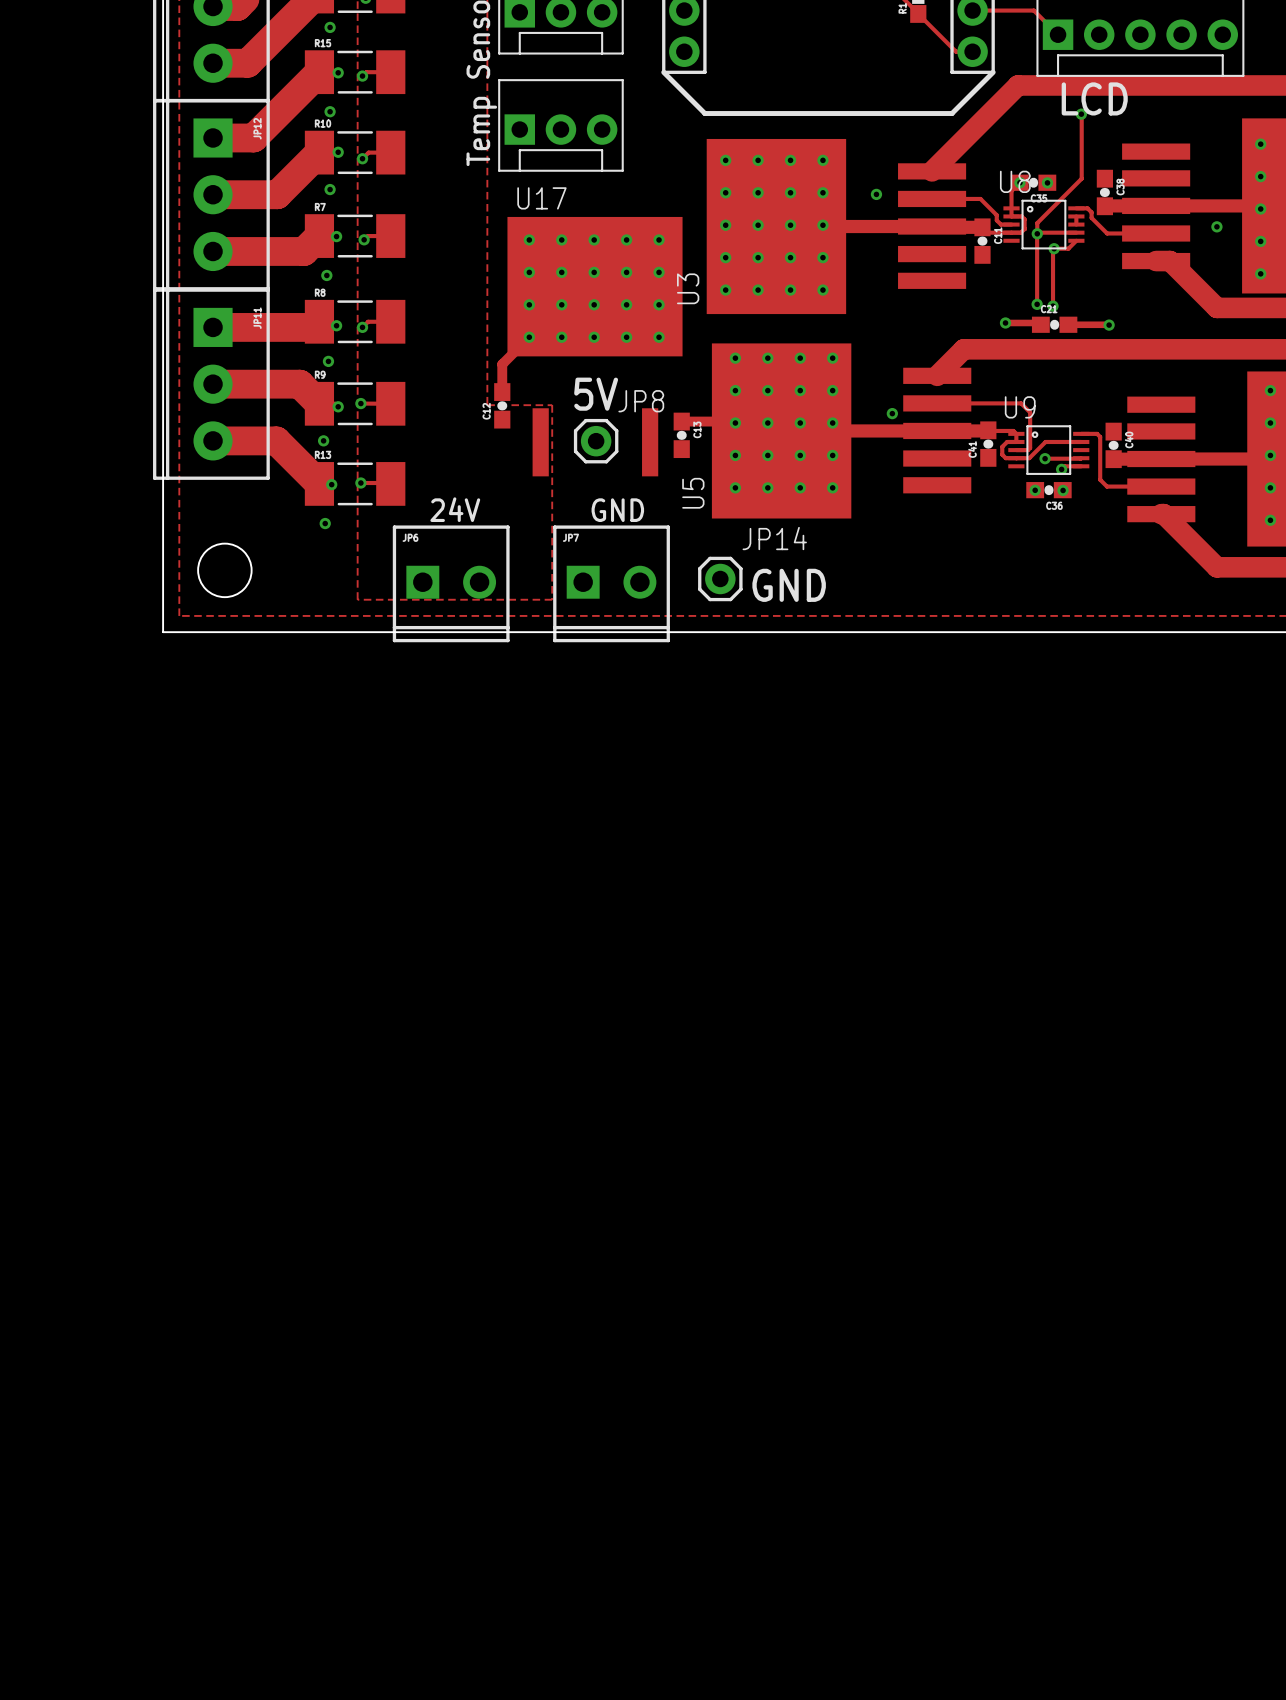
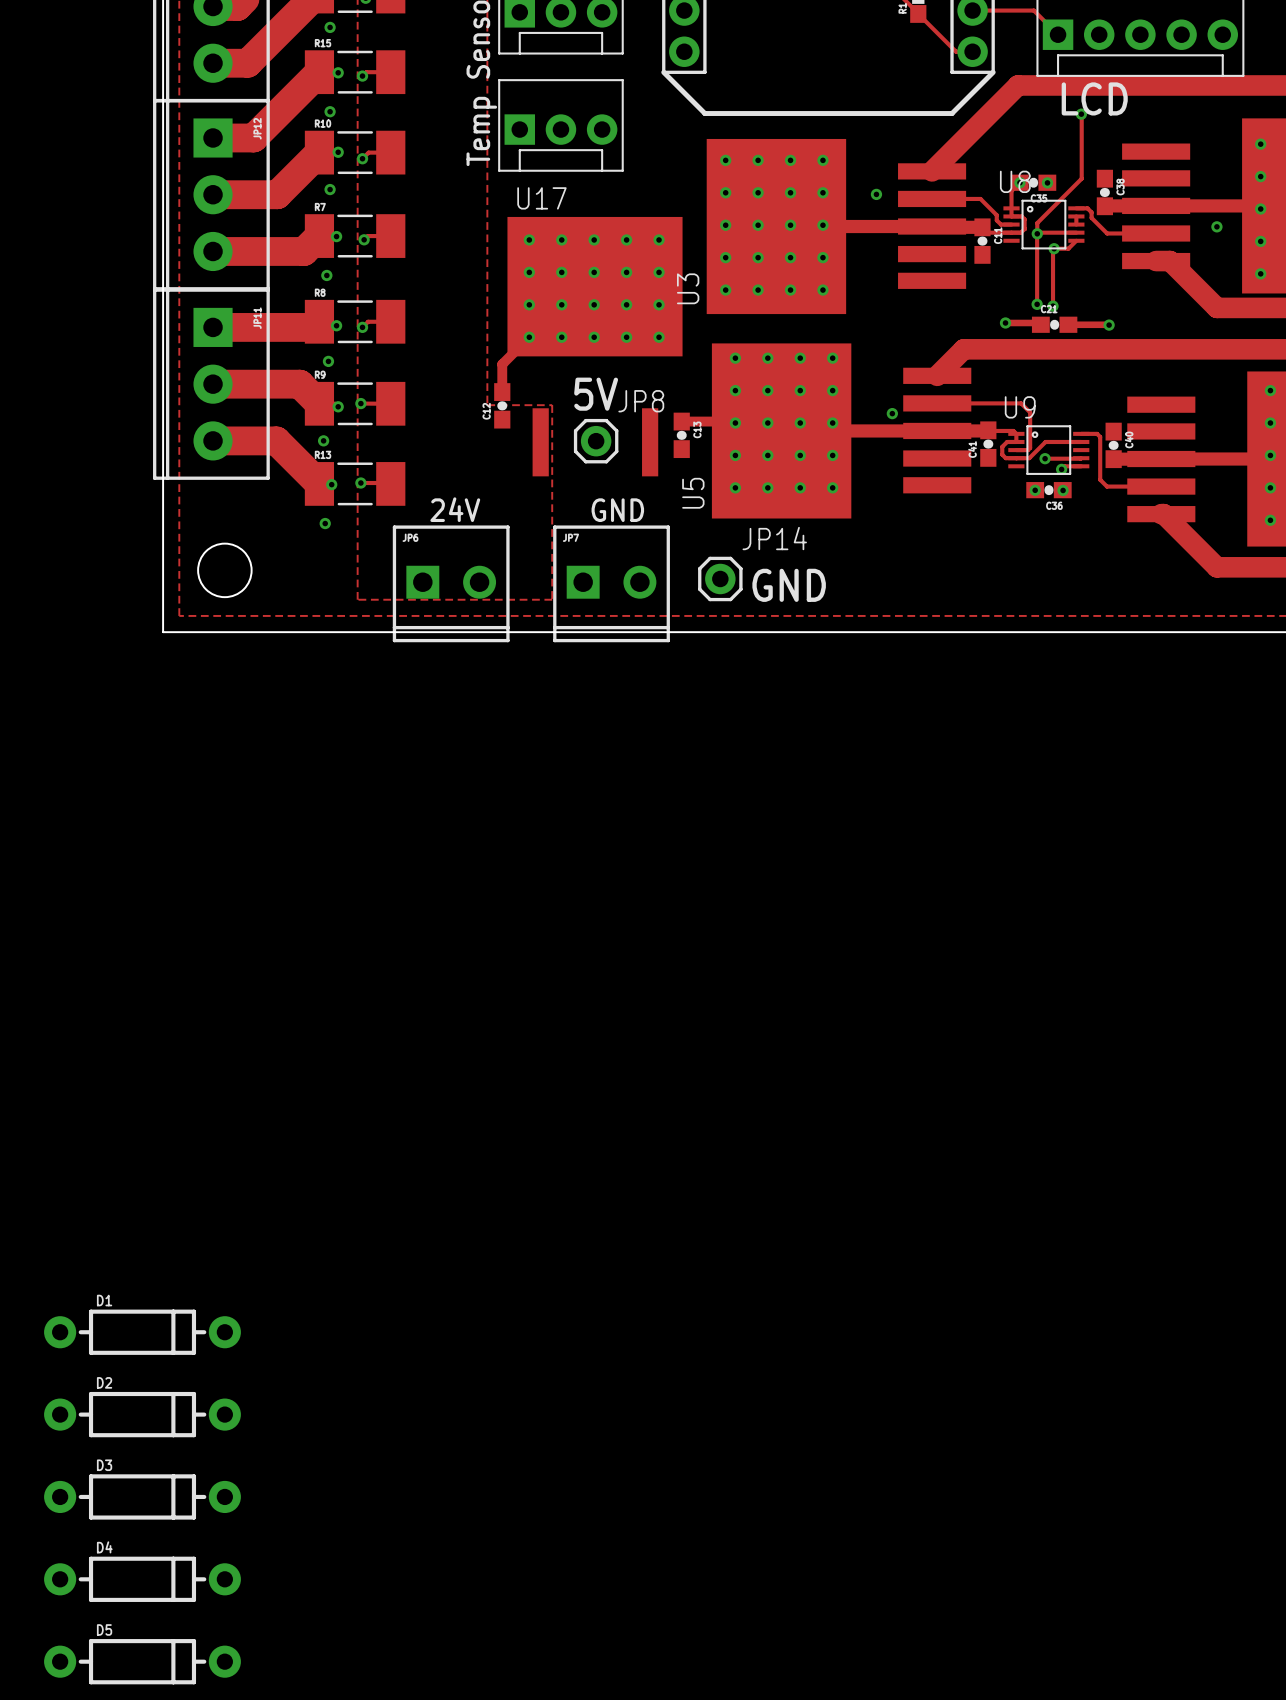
D1: none -> (142, 1332)
D2: none -> (142, 1414)
D3: none -> (142, 1496)
D4: none -> (142, 1579)
D5: none -> (142, 1661)

